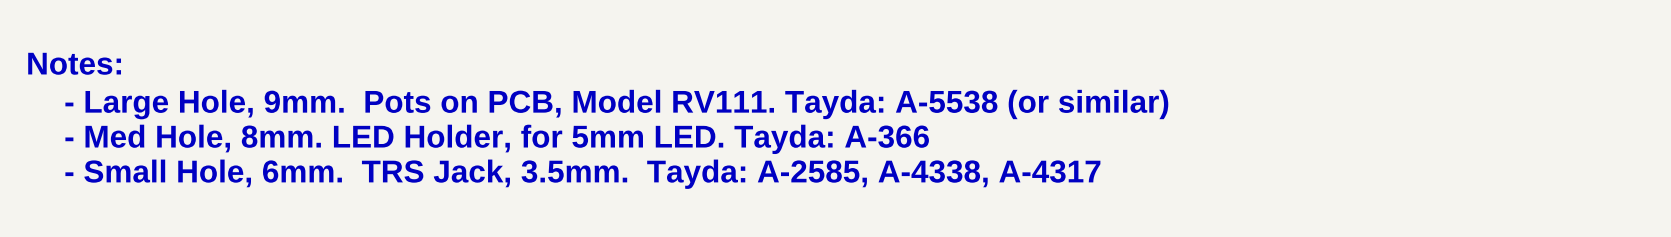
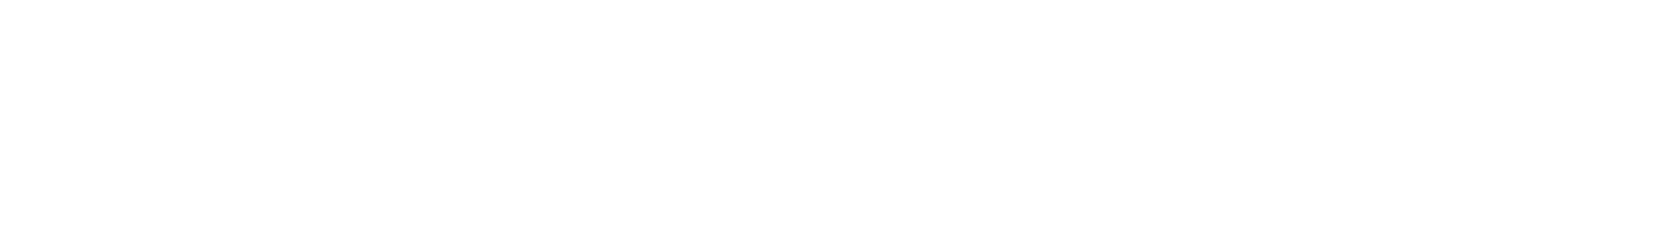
text: Notes: (74, 63) -> none
text: - Large Hole, 9mm. Pots on PCB, Model RV111. Tayda: A-5538 (or similar) (616, 104) -> none
text: - Med Hole, 8mm. LED Holder, for 5mm LED. Tayda: A-366 (497, 139) -> none
text: - Small Hole, 6mm. TRS Jack, 3.5mm. Tayda: A-2585, A-4338, A-4317 (582, 174) -> none

